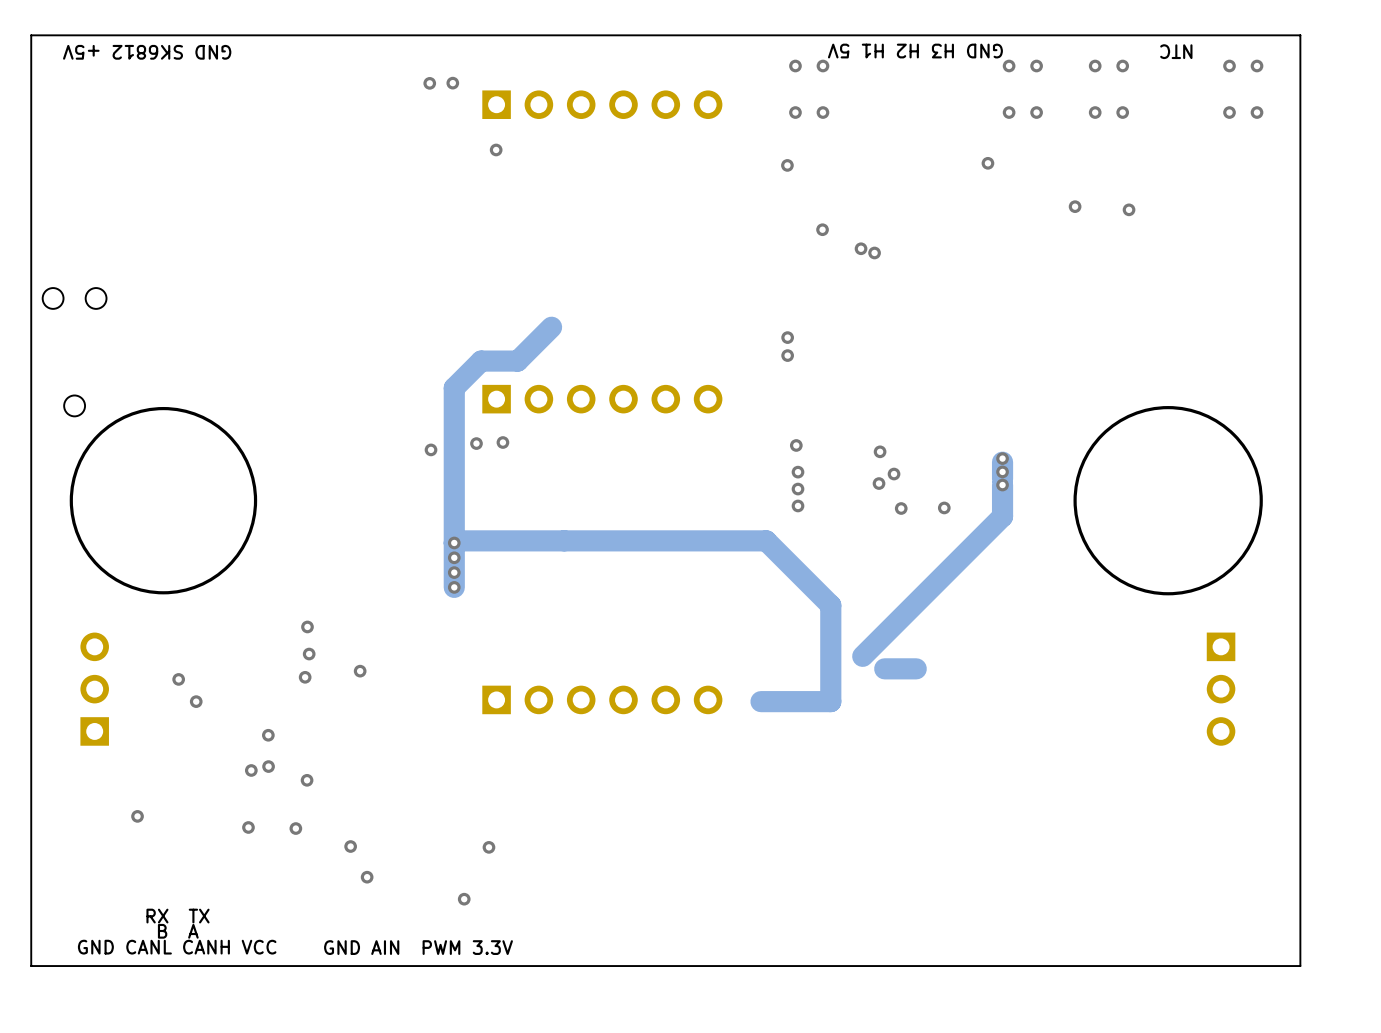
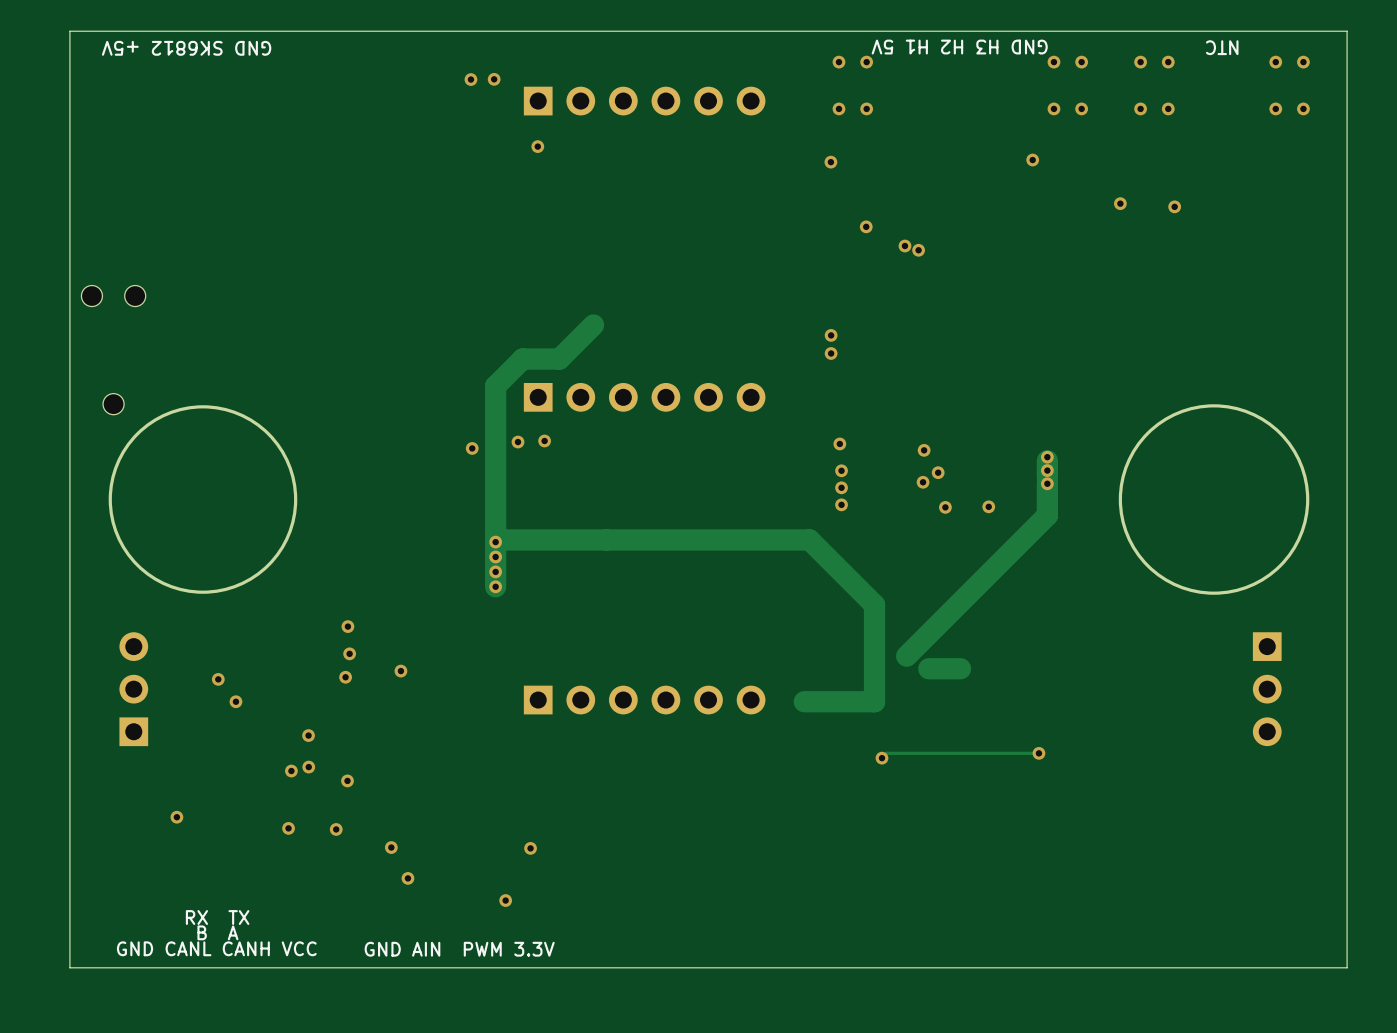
track: none -> (1038, 753) (886, 753) (881, 758)
via: none -> (1038, 753)
via: none -> (881, 758)

